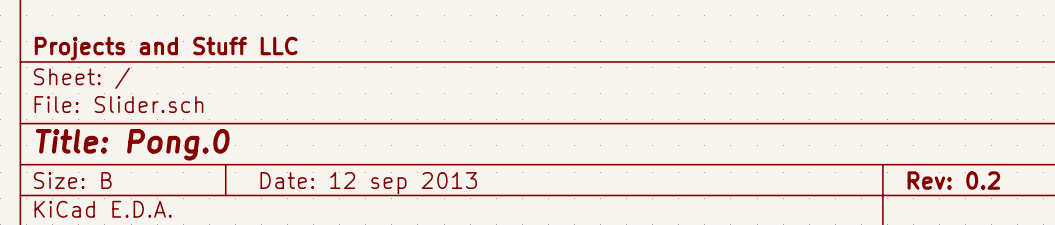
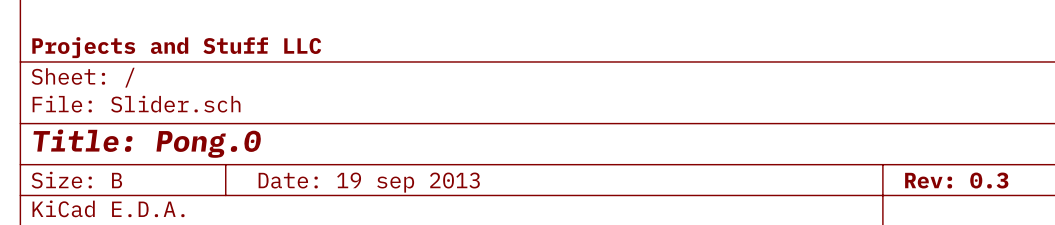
title block: Rev: 0.2 (953, 180) -> Rev: 0.3 (956, 180)
title block: Date: 12 sep 2013 (368, 183) -> Date: 19 sep 2013 (369, 182)

